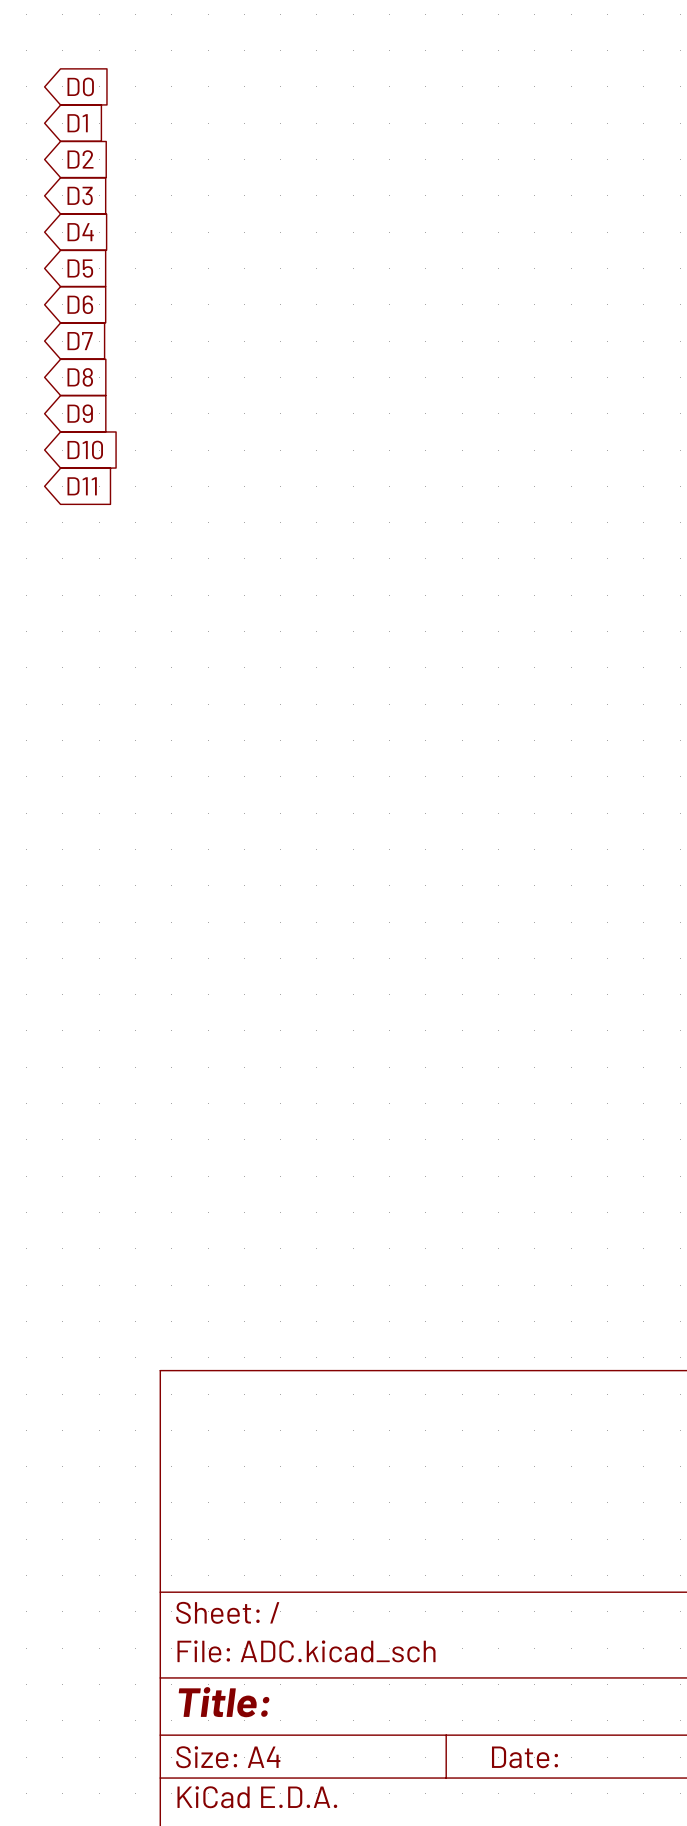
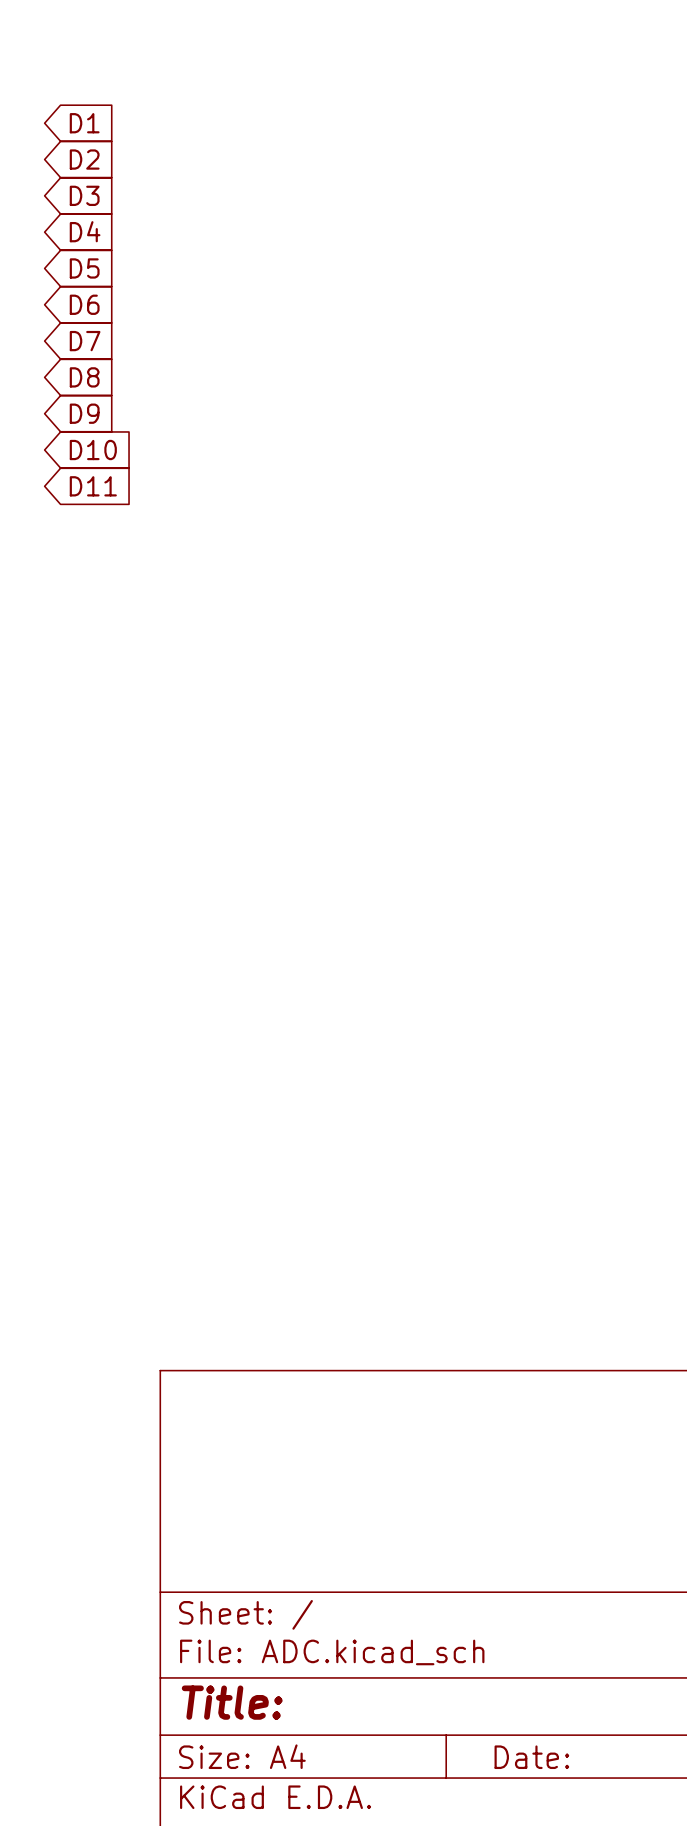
global label: D0 (80, 86) -> none

